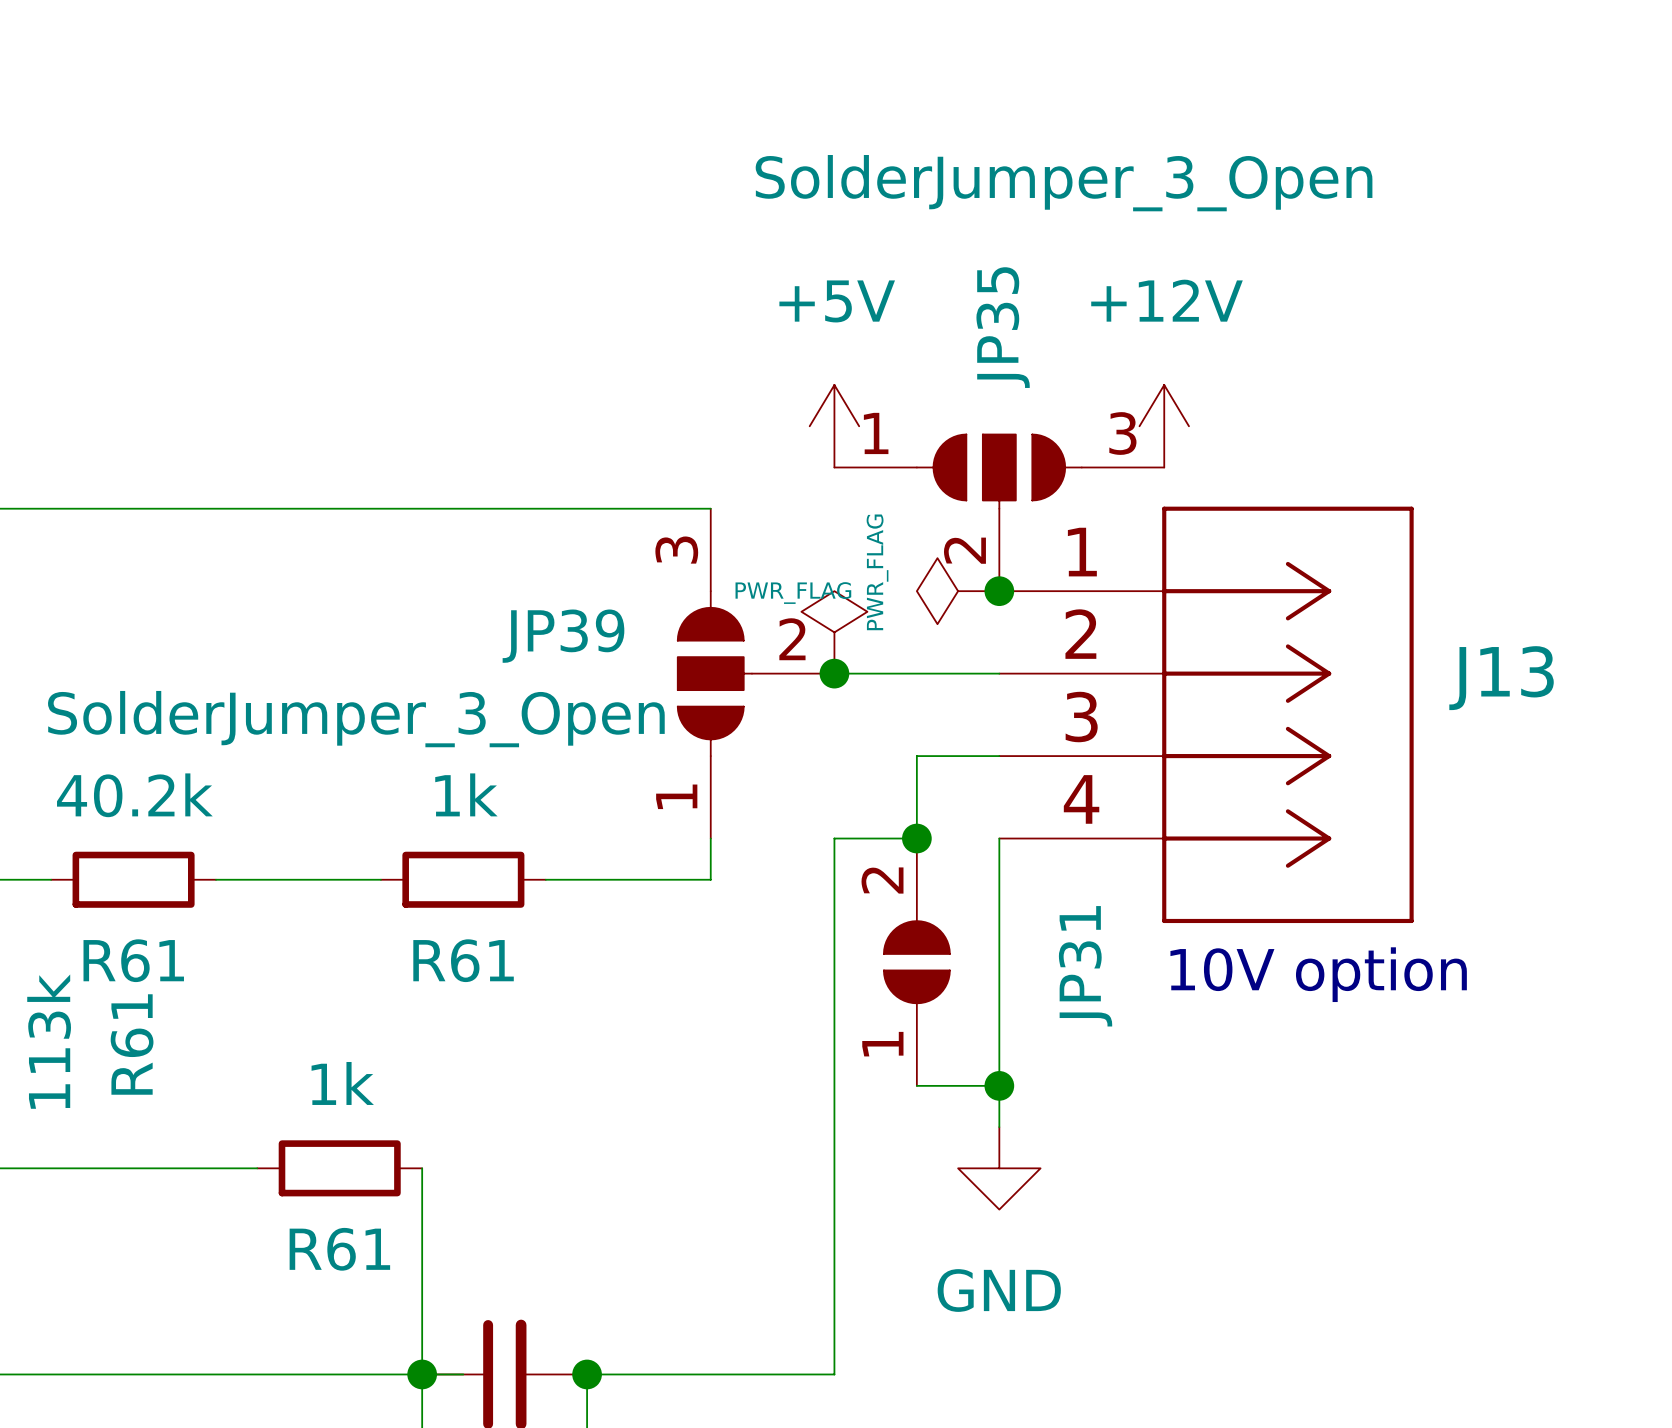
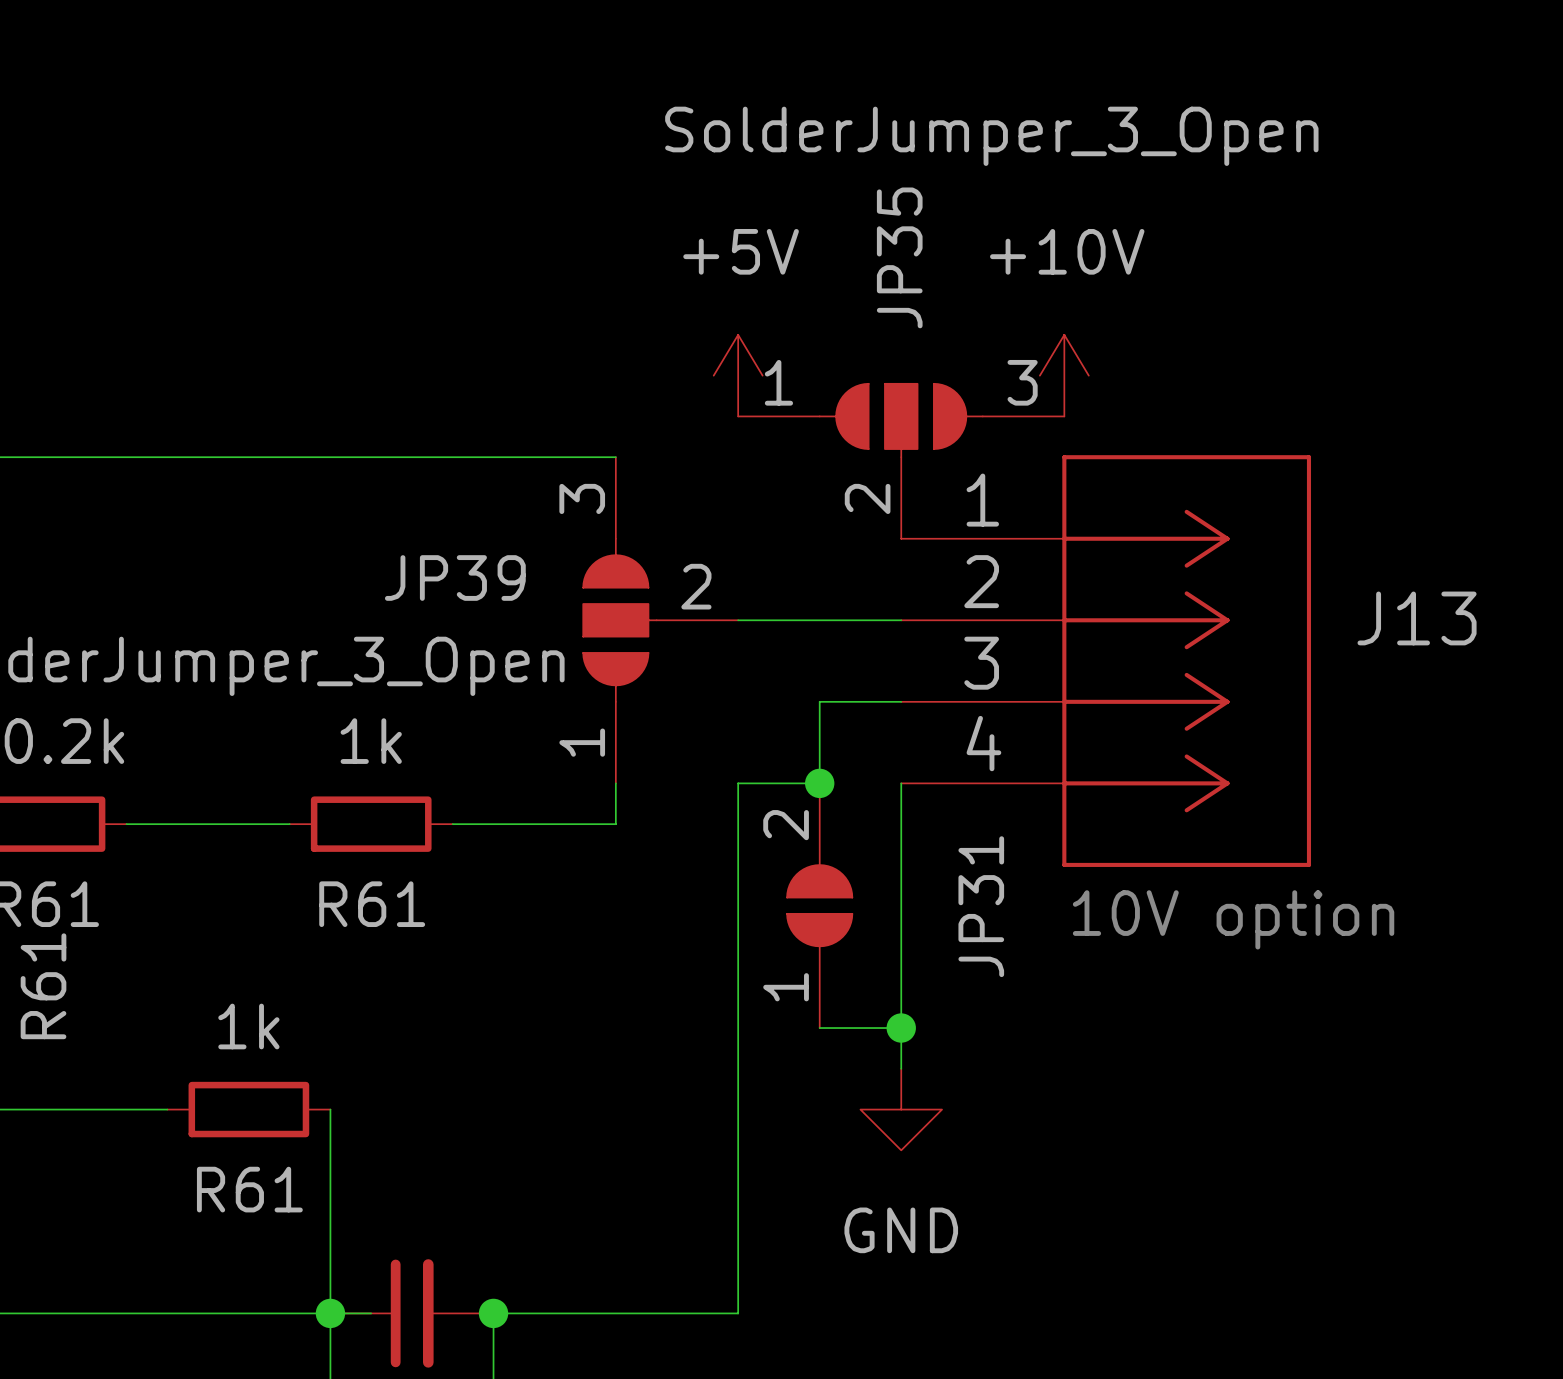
power symbol: +12V (1164, 426) -> +10V (1064, 375)
power symbol: PWR_FLAG (958, 591) -> none
junction: (999, 591) -> none
power symbol: PWR_FLAG (834, 632) -> none
junction: (834, 673) -> none

